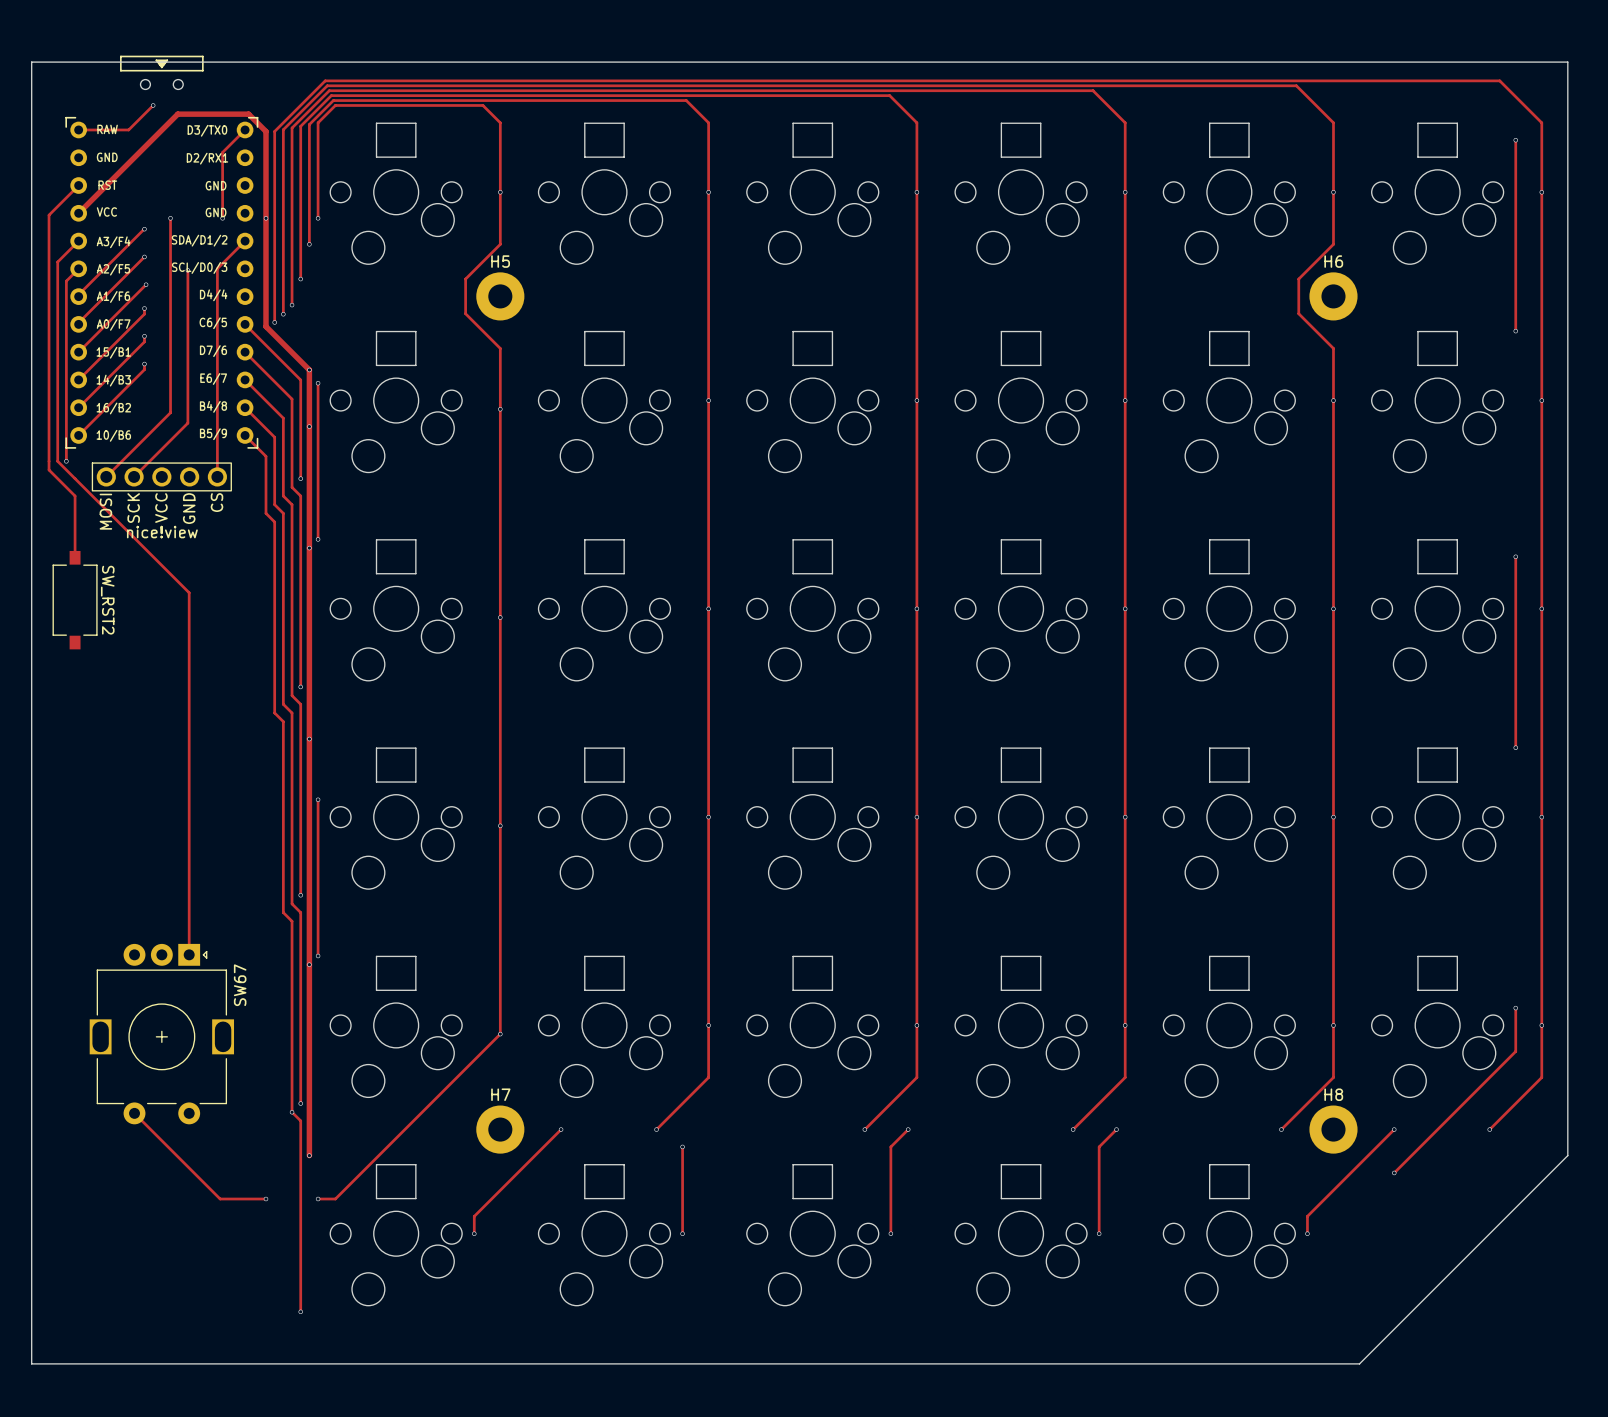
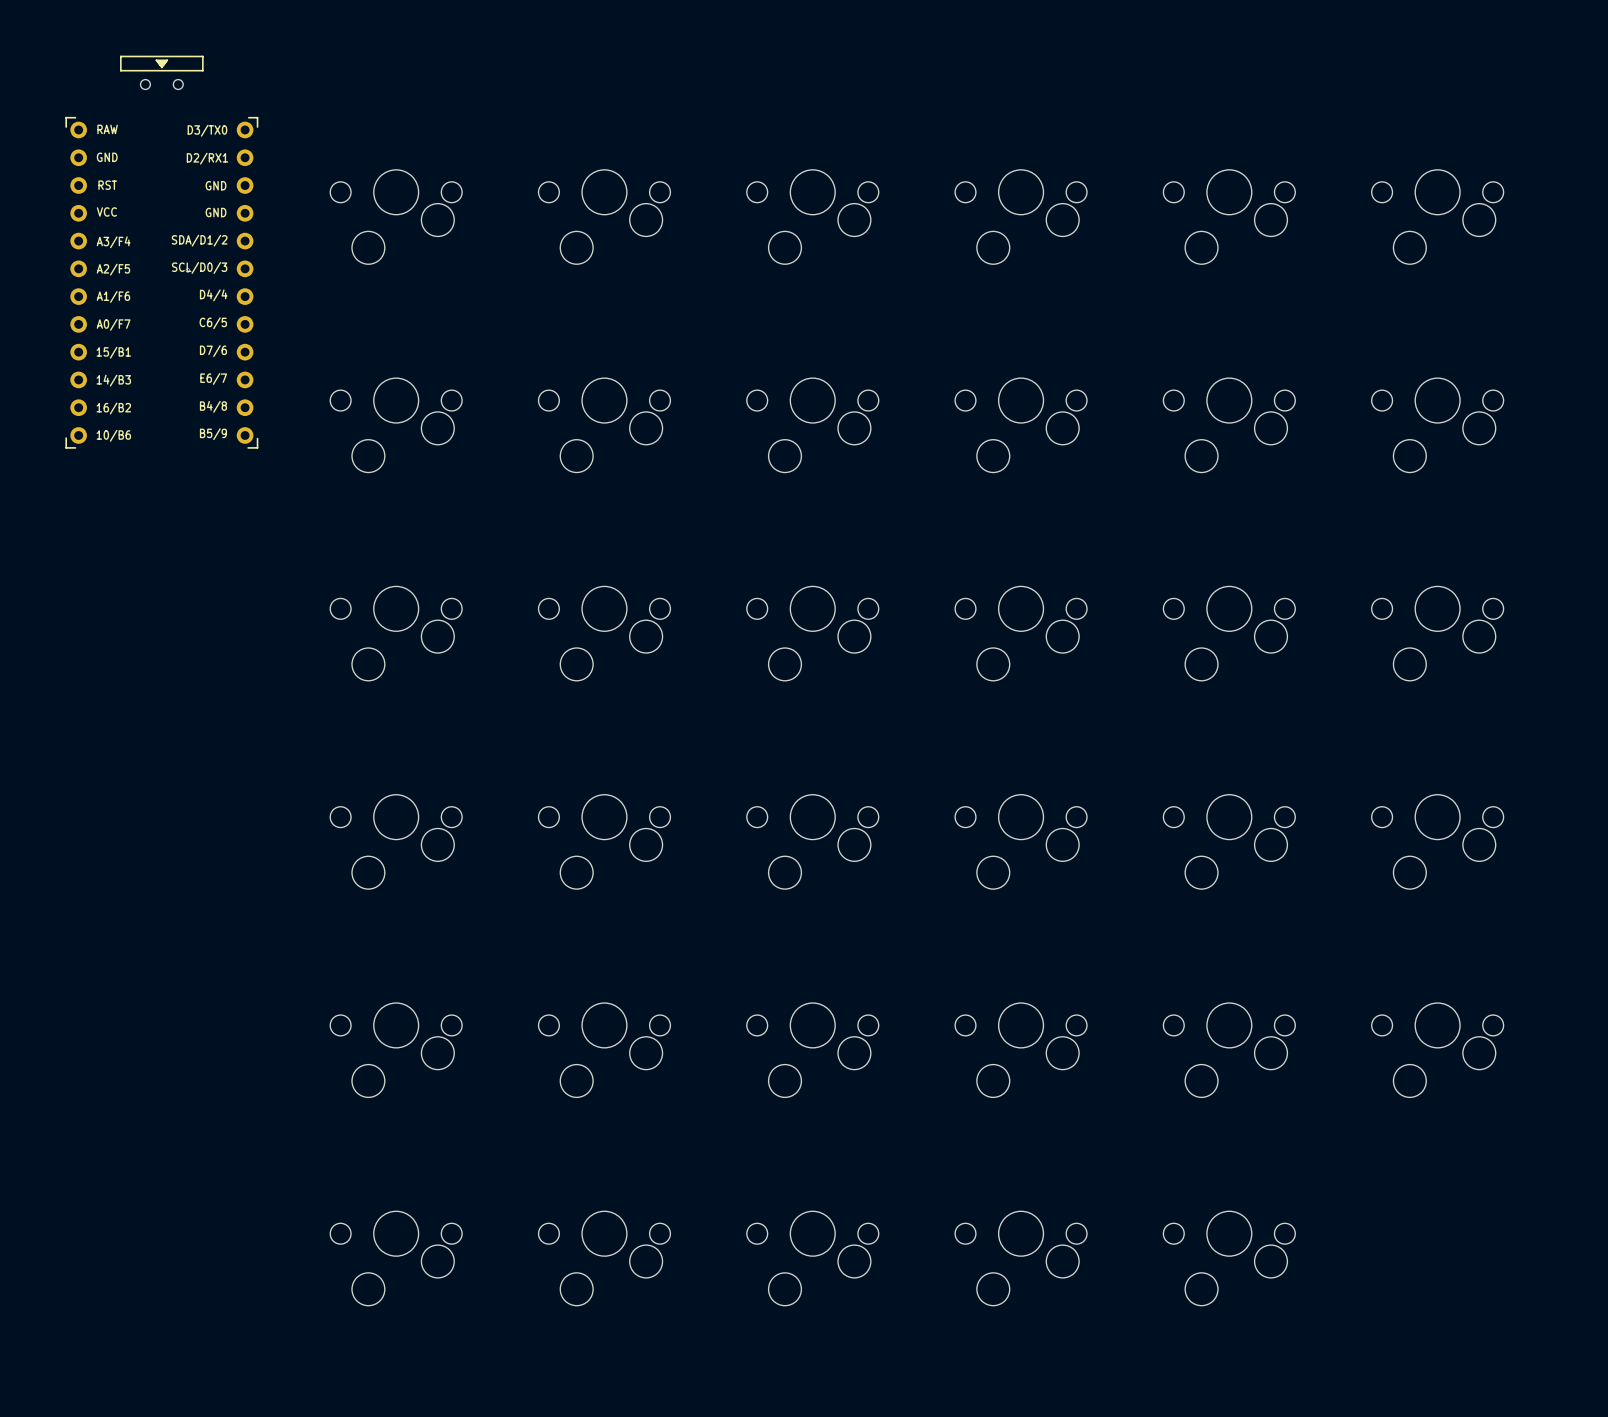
board edge: (31, 62) (1567, 62) (1567, 1155) (1359, 1363) (31, 1363) (31, 62) -> none
track: (153, 105) (128, 129) (78, 129) -> none
via: (153, 105) -> none
track: (245, 129) (222, 152) (222, 218) -> none
part: (396, 140) -> none
part: (604, 140) -> none
part: (812, 140) -> none
part: (1021, 140) -> none
part: (1229, 140) -> none
part: (1437, 140) -> none
track: (1515, 140) (1515, 331) -> none
via: (1515, 140) -> none
track: (78, 185) (49, 215) (49, 469) (75, 496) (75, 557) -> none
via: (500, 192) -> none
via: (708, 192) -> none
via: (916, 192) -> none
via: (1125, 192) -> none
via: (1333, 192) -> none
via: (1541, 192) -> none
track: (78, 213) (177, 114) (248, 114) (266, 131) (266, 326) (309, 369) (309, 1155) -> none
track: (170, 218) (170, 412) (106, 476) -> none
via: (170, 218) -> none
via: (222, 218) -> none
via: (266, 218) -> none
track: (318, 218) (318, 122) (335, 105) (482, 105) (500, 122) (500, 244) (465, 279) (465, 313) (500, 348) (500, 1034) (335, 1199) (318, 1199) -> none
via: (318, 218) -> none
track: (144, 229) (78, 296) -> none
via: (144, 229) -> none
track: (78, 241) (57, 262) (57, 461) (189, 592) (189, 954) -> none
track: (245, 241) (217, 268) (217, 476) -> none
track: (309, 244) (309, 124) (333, 100) (686, 100) (708, 122) (708, 1077) (656, 1129) -> none
via: (309, 244) -> none
track: (144, 256) (78, 324) -> none
via: (144, 256) -> none
track: (78, 268) (66, 281) (66, 461) -> none
track: (187, 270) (187, 423) (134, 476) -> none
track: (300, 279) (300, 126) (331, 95) (889, 95) (916, 122) (916, 1077) (864, 1129) -> none
via: (300, 279) -> none
track: (146, 284) (78, 352) -> none
via: (146, 284) -> none
H5: (500, 296) -> none
H6: (1333, 296) -> none
track: (292, 305) (292, 128) (329, 90) (1093, 90) (1125, 122) (1125, 1077) (1073, 1129) -> none
via: (292, 305) -> none
track: (144, 308) (144, 314) (78, 379) -> none
via: (144, 308) -> none
track: (283, 314) (283, 129) (327, 85) (1296, 85) (1333, 122) (1333, 244) (1298, 279) (1298, 313) (1333, 348) (1333, 1077) (1281, 1129) -> none
via: (283, 314) -> none
track: (274, 322) (274, 131) (325, 80) (1499, 80) (1541, 122) (1541, 1077) (1489, 1129) -> none
via: (274, 322) -> none
track: (245, 324) (300, 380) (300, 478) -> none
via: (1515, 331) -> none
track: (144, 336) (144, 341) (78, 407) -> none
via: (144, 336) -> none
part: (396, 348) -> none
part: (604, 348) -> none
part: (812, 348) -> none
part: (1021, 348) -> none
part: (1229, 348) -> none
part: (1437, 348) -> none
track: (245, 352) (292, 399) (292, 487) (300, 496) (300, 686) -> none
track: (144, 364) (144, 369) (78, 435) -> none
via: (144, 364) -> none
via: (309, 369) -> none
track: (245, 379) (283, 418) (283, 496) (292, 504) (292, 695) (300, 704) (300, 895) -> none
track: (318, 383) (318, 539) -> none
via: (318, 383) -> none
via: (708, 400) -> none
via: (916, 400) -> none
via: (1125, 400) -> none
via: (1333, 400) -> none
via: (1541, 400) -> none
track: (245, 407) (274, 437) (274, 504) (283, 513) (283, 704) (292, 712) (292, 903) (300, 912) (300, 1103) -> none
via: (500, 409) -> none
via: (309, 426) -> none
track: (245, 435) (266, 456) (266, 513) (274, 522) (274, 712) (283, 721) (283, 912) (292, 921) (292, 1112) (300, 1120) (300, 1311) -> none
via: (66, 461) -> none
part: nice!view (161, 476) -> none
via: (300, 478) -> none
via: (318, 539) -> none
via: (309, 548) -> none
part: (396, 556) -> none
part: (604, 556) -> none
part: (812, 556) -> none
part: (1021, 556) -> none
part: (1229, 556) -> none
part: (1437, 556) -> none
track: (1515, 556) (1515, 747) -> none
via: (1515, 556) -> none
SW_RST2: (75, 600) -> none
via: (708, 608) -> none
via: (916, 608) -> none
via: (1125, 608) -> none
via: (1333, 608) -> none
via: (1541, 608) -> none
via: (500, 617) -> none
via: (300, 686) -> none
via: (309, 739) -> none
via: (1515, 747) -> none
part: (396, 765) -> none
part: (604, 765) -> none
part: (812, 765) -> none
part: (1021, 765) -> none
part: (1229, 765) -> none
part: (1437, 765) -> none
track: (318, 799) (318, 956) -> none
via: (318, 799) -> none
via: (708, 817) -> none
via: (916, 817) -> none
via: (1125, 817) -> none
via: (1333, 817) -> none
via: (1541, 817) -> none
via: (500, 825) -> none
via: (300, 895) -> none
via: (318, 956) -> none
via: (309, 964) -> none
part: (396, 973) -> none
part: (604, 973) -> none
part: (812, 973) -> none
part: (1021, 973) -> none
part: (1229, 973) -> none
part: (1437, 973) -> none
track: (1515, 1008) (1515, 1051) (1394, 1172) -> none
via: (1515, 1008) -> none
via: (708, 1025) -> none
via: (916, 1025) -> none
via: (1125, 1025) -> none
via: (1333, 1025) -> none
via: (1541, 1025) -> none
SW67: (161, 1034) -> none
via: (500, 1034) -> none
via: (300, 1103) -> none
via: (292, 1112) -> none
track: (134, 1113) (220, 1199) (266, 1199) -> none
H7: (500, 1129) -> none
track: (561, 1129) (474, 1216) (474, 1233) -> none
via: (561, 1129) -> none
via: (656, 1129) -> none
via: (864, 1129) -> none
track: (908, 1129) (890, 1146) (890, 1233) -> none
via: (908, 1129) -> none
via: (1073, 1129) -> none
track: (1116, 1129) (1099, 1146) (1099, 1233) -> none
via: (1116, 1129) -> none
via: (1281, 1129) -> none
H8: (1333, 1129) -> none
track: (1394, 1129) (1307, 1216) (1307, 1233) -> none
via: (1394, 1129) -> none
via: (1489, 1129) -> none
track: (682, 1146) (682, 1233) -> none
via: (682, 1146) -> none
via: (309, 1155) -> none
via: (1394, 1172) -> none
part: (396, 1181) -> none
part: (604, 1181) -> none
part: (812, 1181) -> none
part: (1021, 1181) -> none
part: (1229, 1181) -> none
via: (266, 1199) -> none
via: (318, 1199) -> none
via: (474, 1233) -> none
via: (682, 1233) -> none
via: (890, 1233) -> none
via: (1099, 1233) -> none
via: (1307, 1233) -> none
via: (300, 1311) -> none

